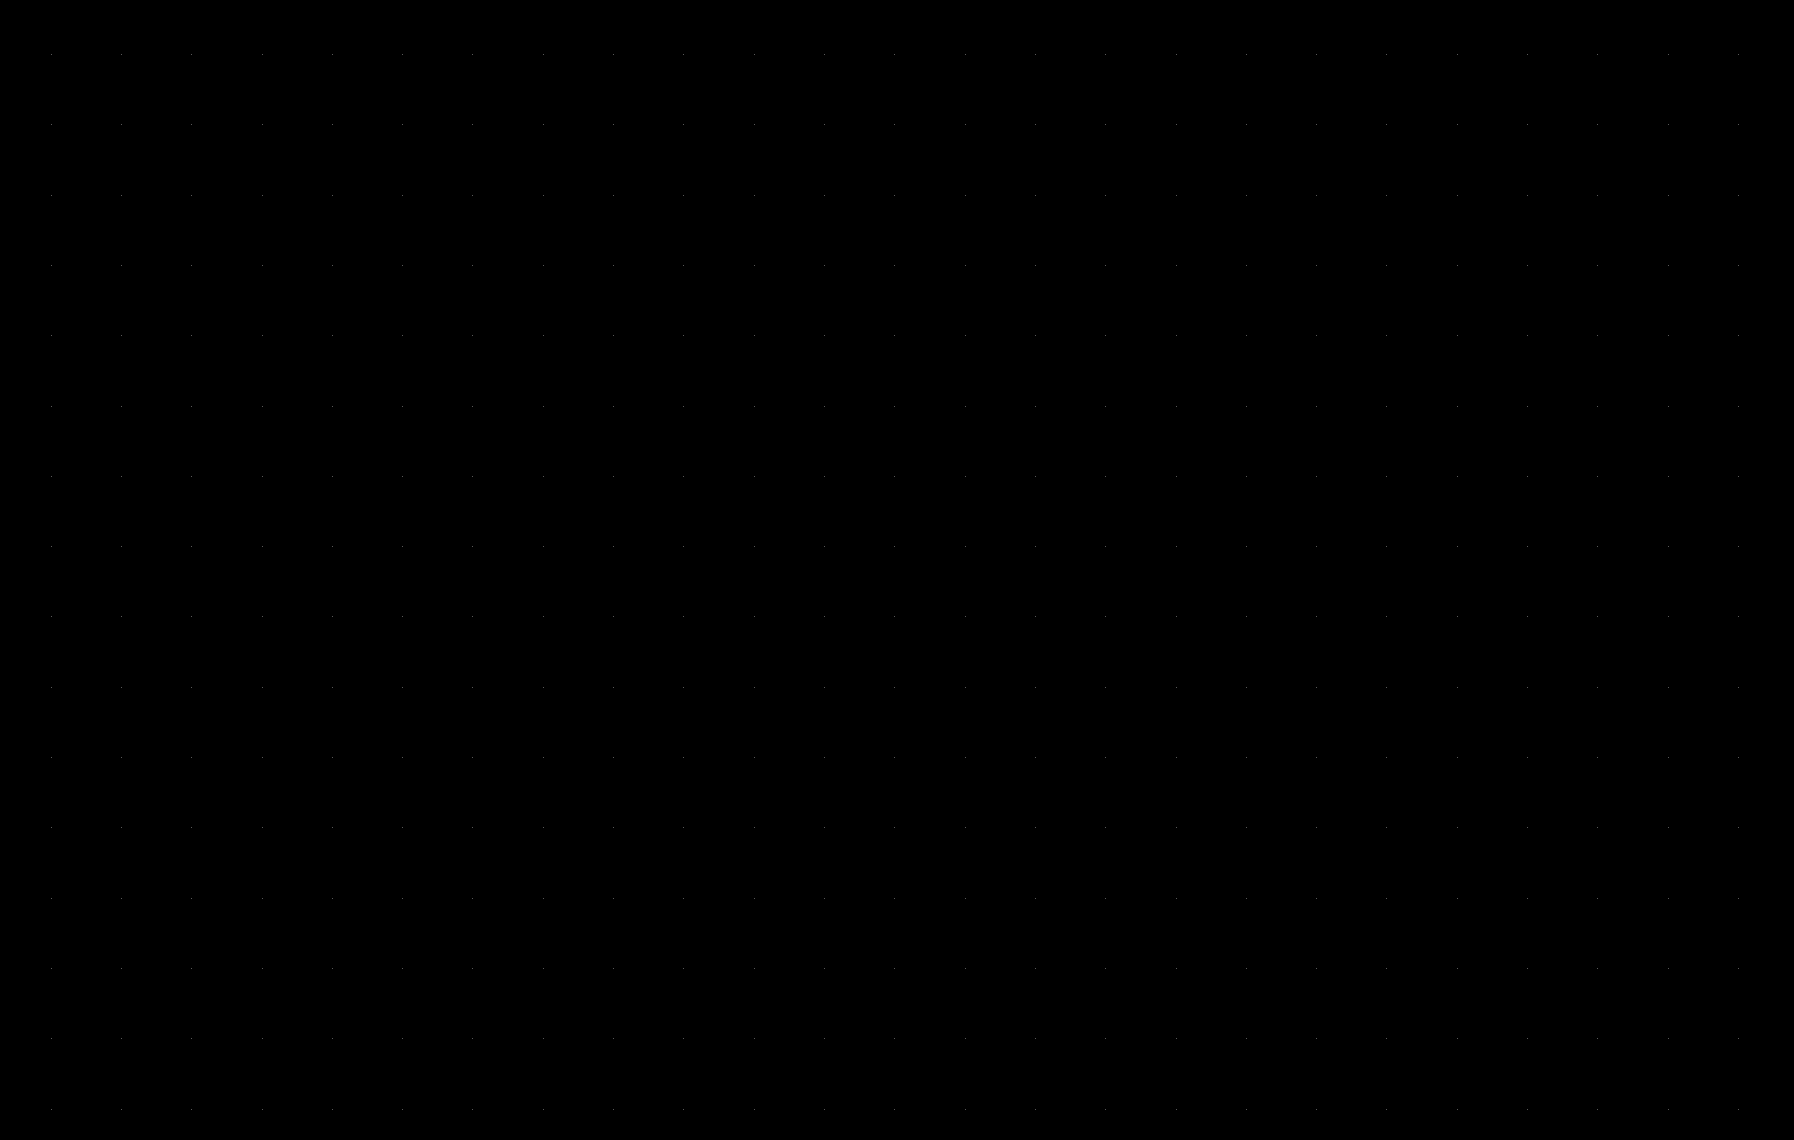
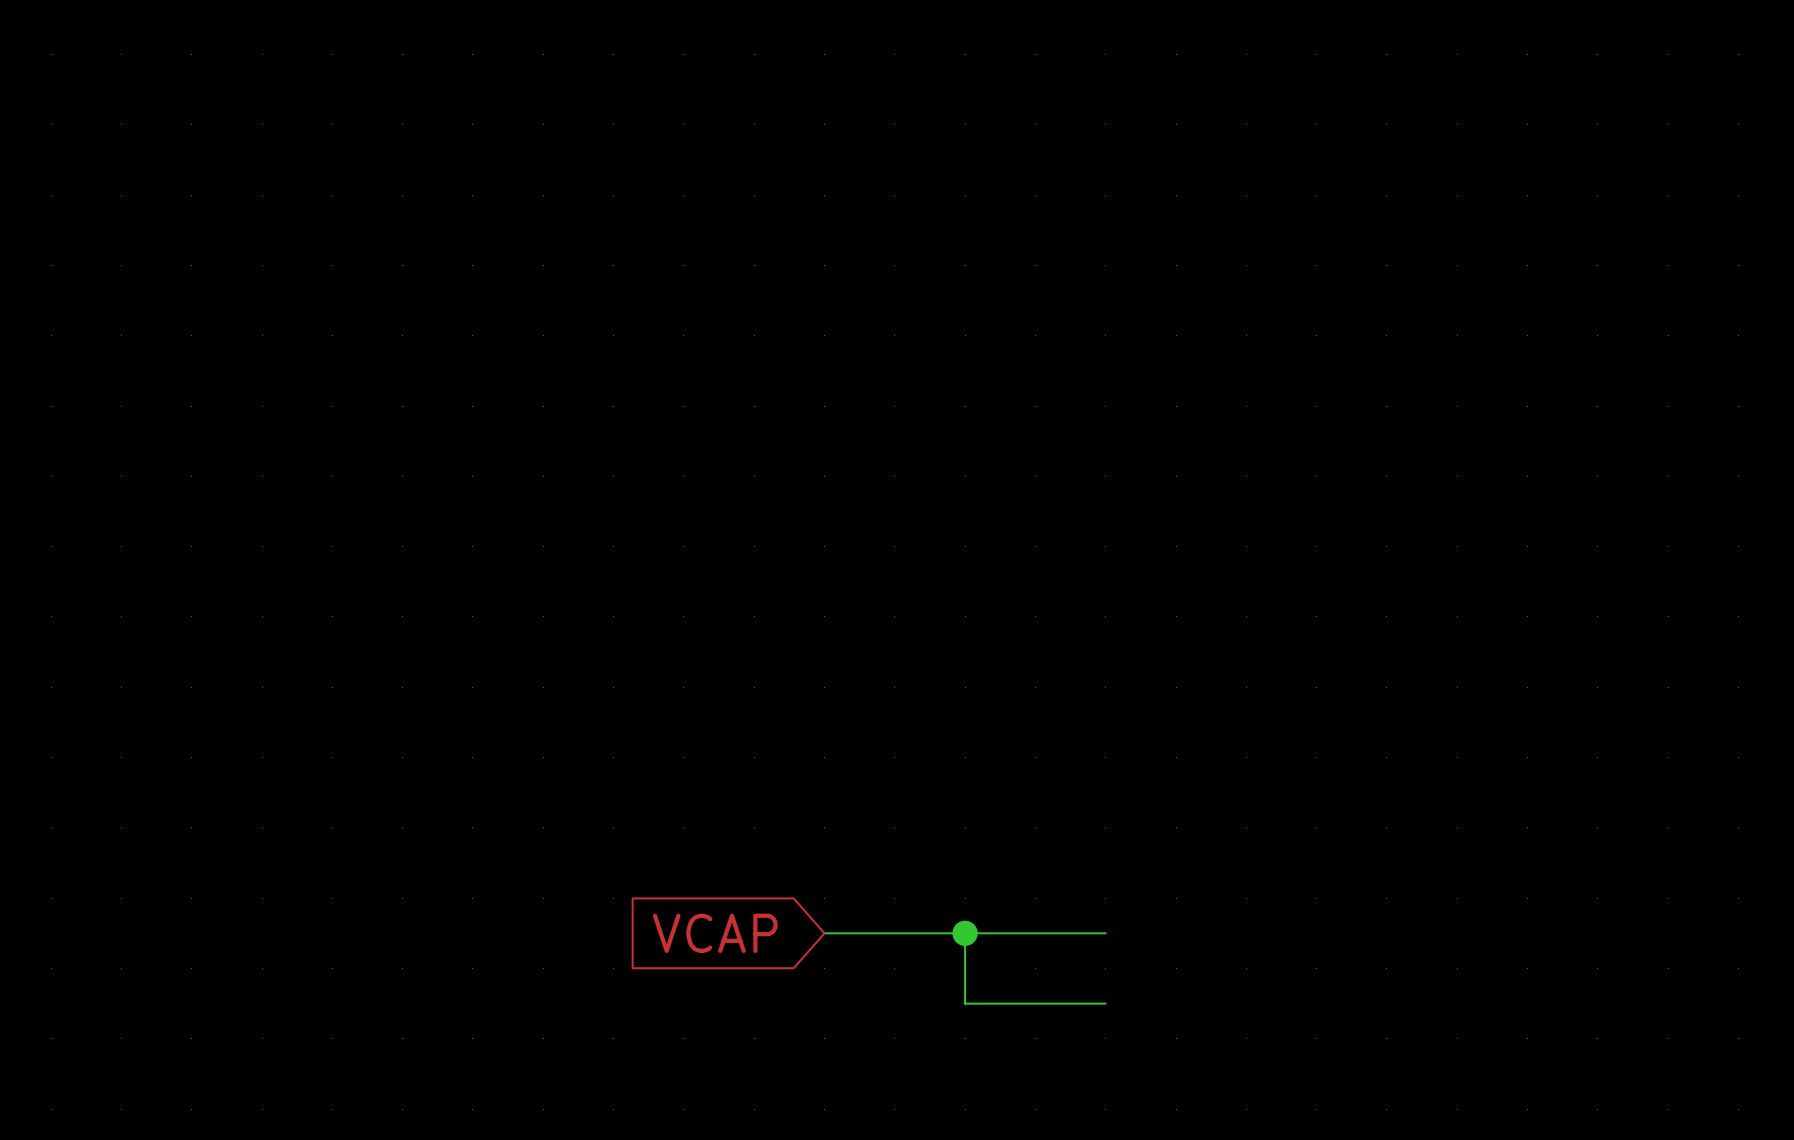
global label: none -> VCAP (715, 933)
wire: none -> (824, 933) (1105, 933)
wire: none -> (965, 933) (965, 1003) (1105, 1003)
junction: none -> (965, 933)

